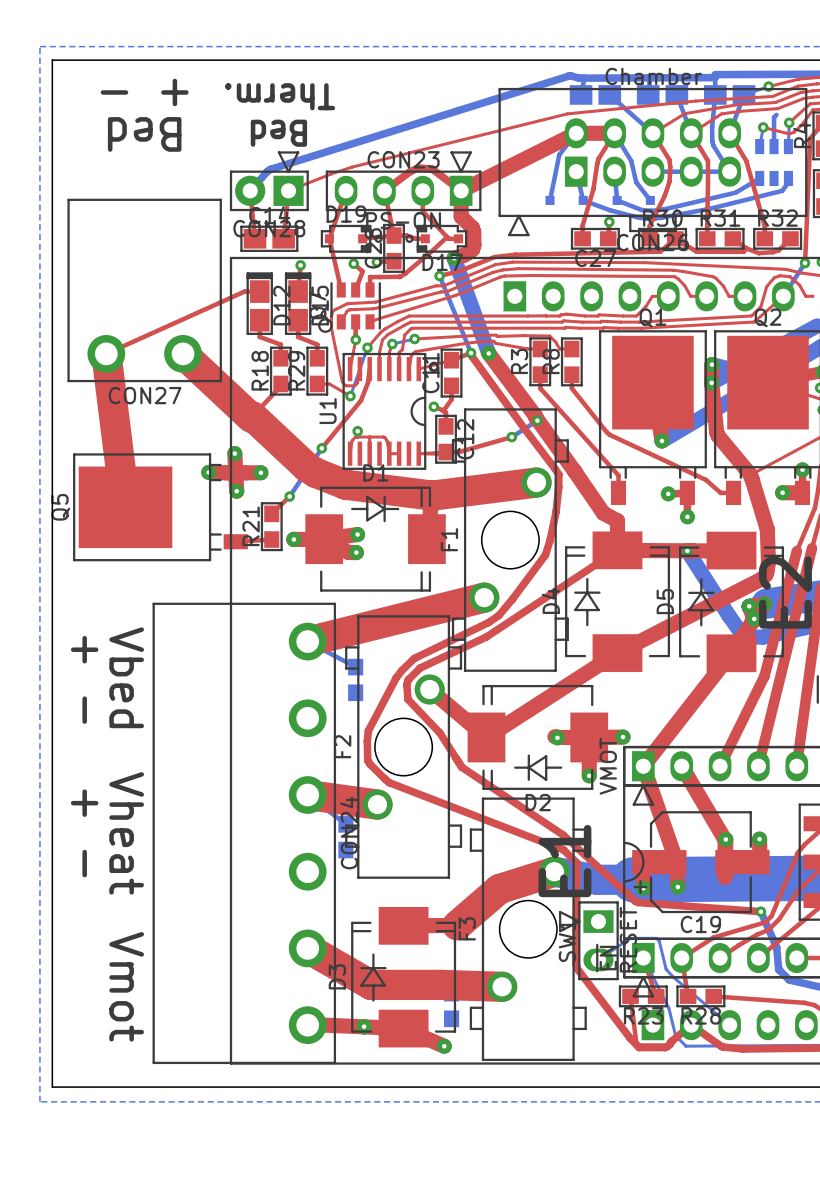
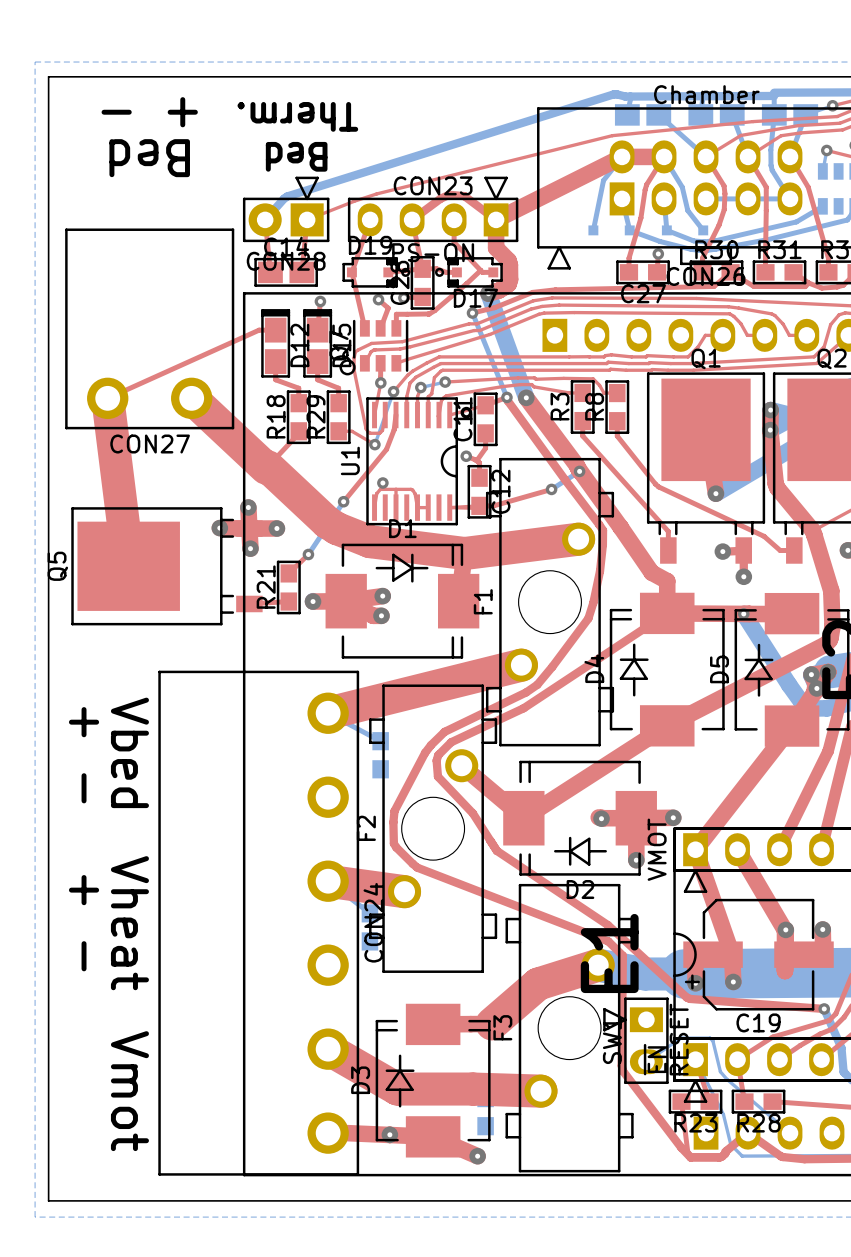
bottom track: (776, 114) (774, 117) (774, 146) -> none

